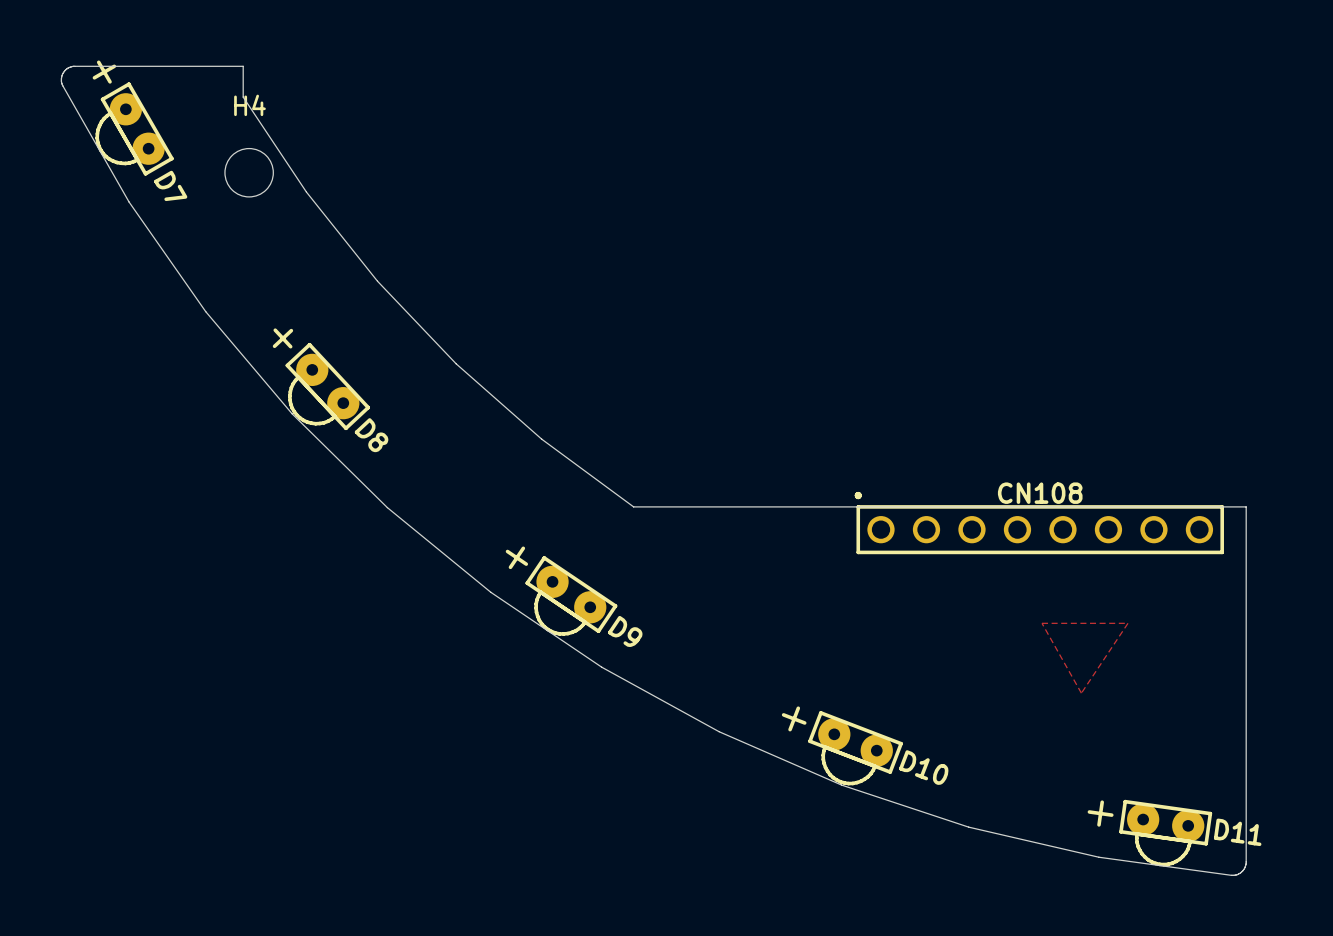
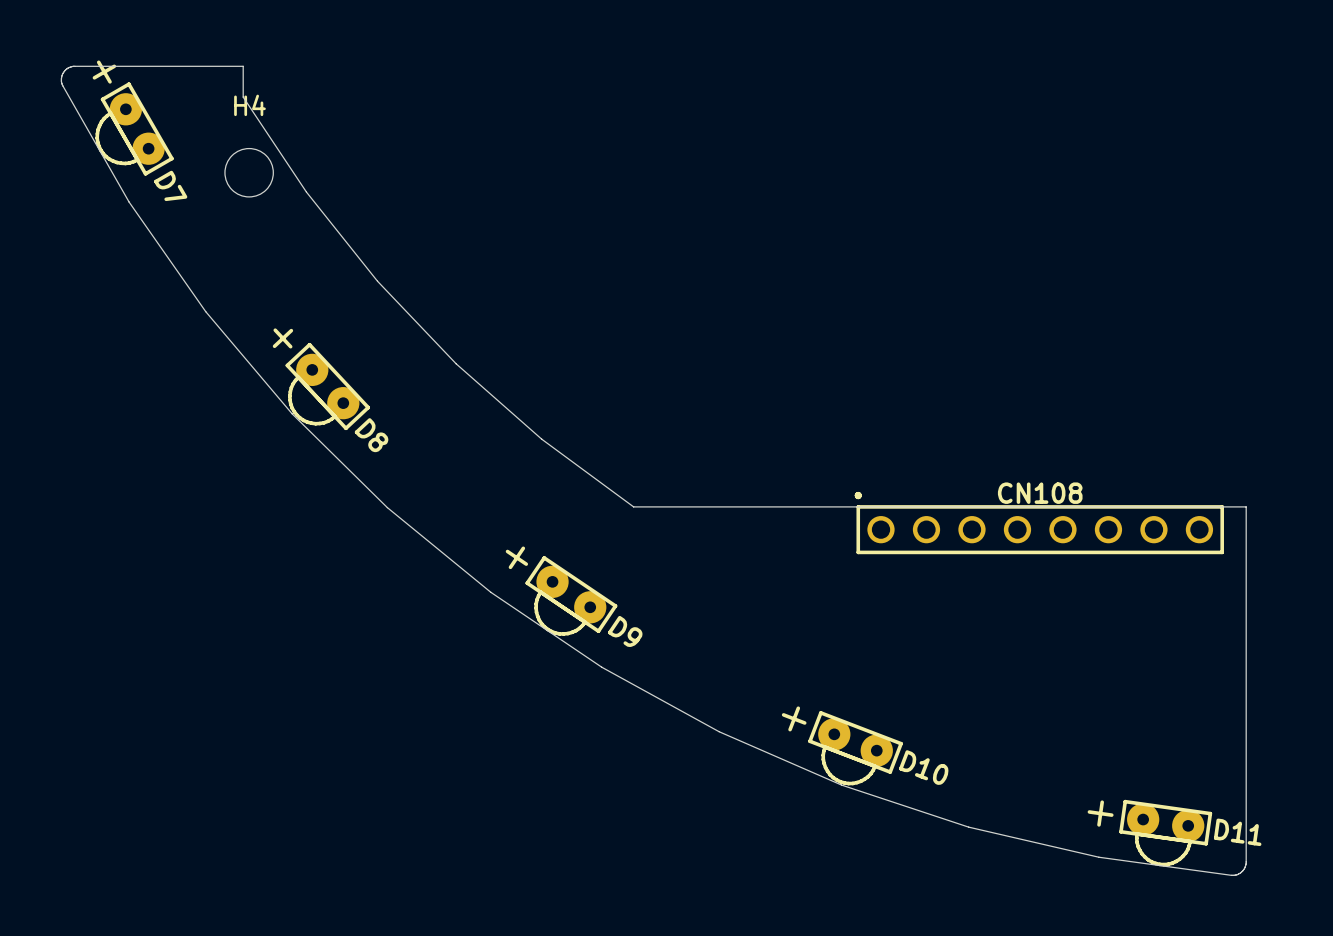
zone outline: (1042, 623) (1081, 693) (1127, 623) (1042, 623) -> none

